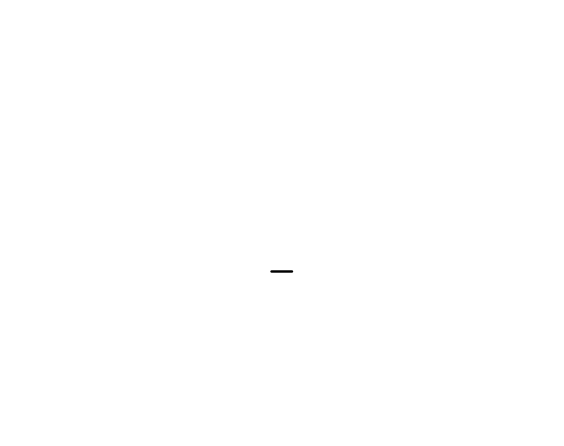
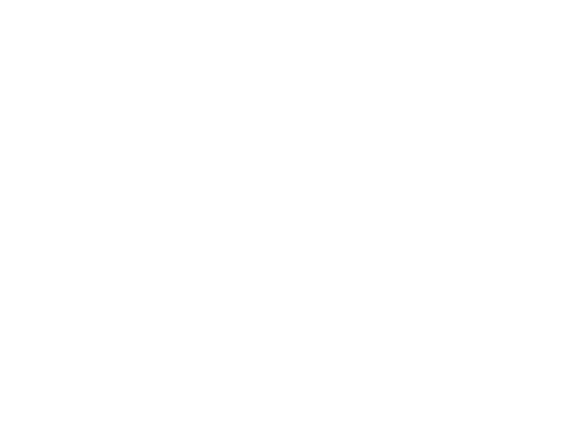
board edge: (271, 271) (292, 271) -> none

